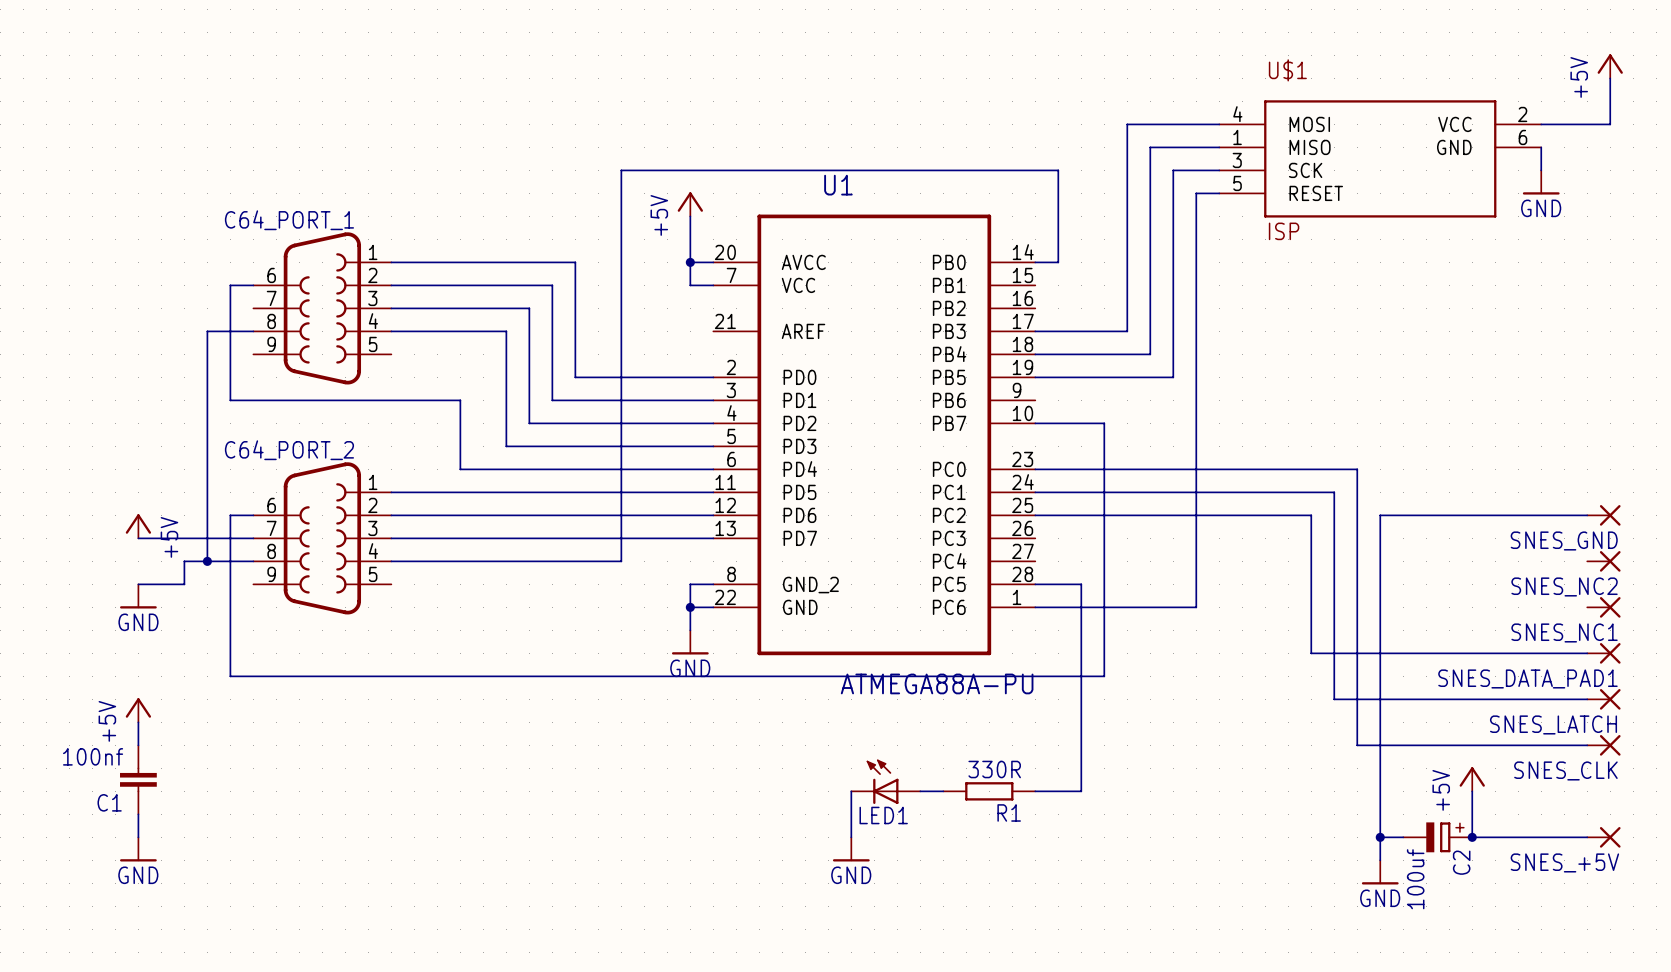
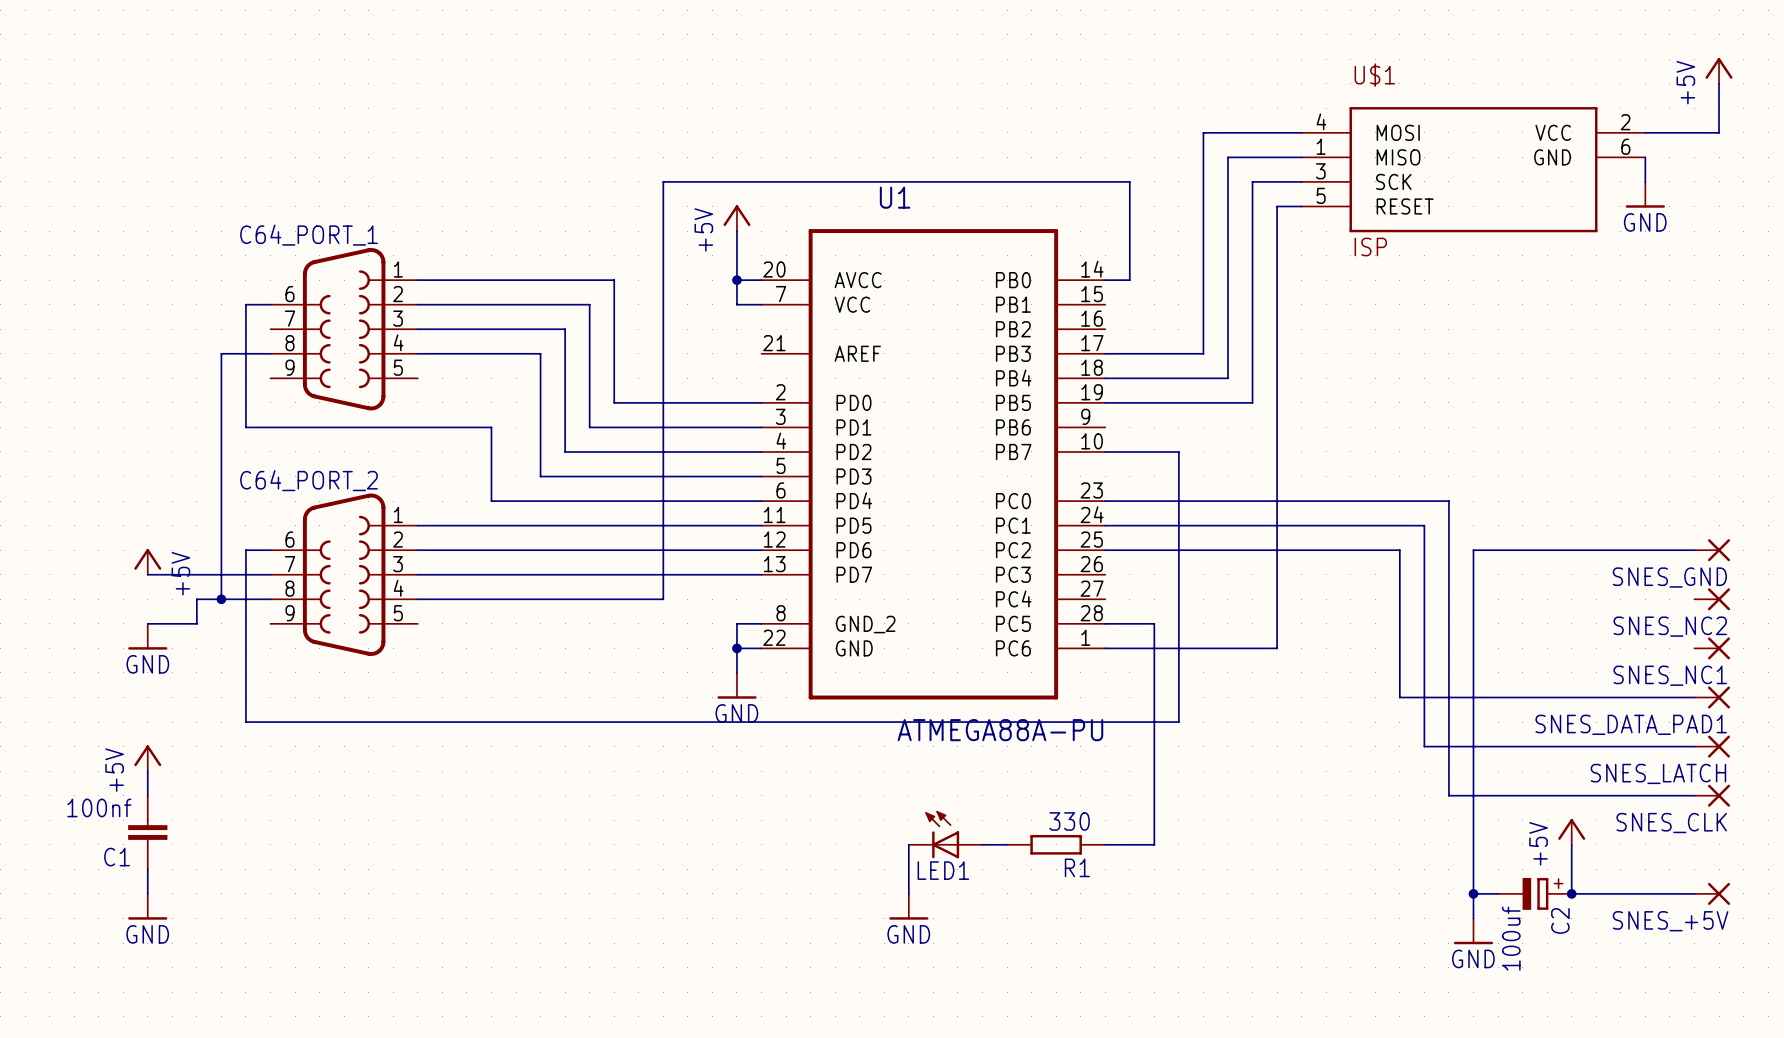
R1 value: 330R (994, 769) -> 330 (1069, 821)

